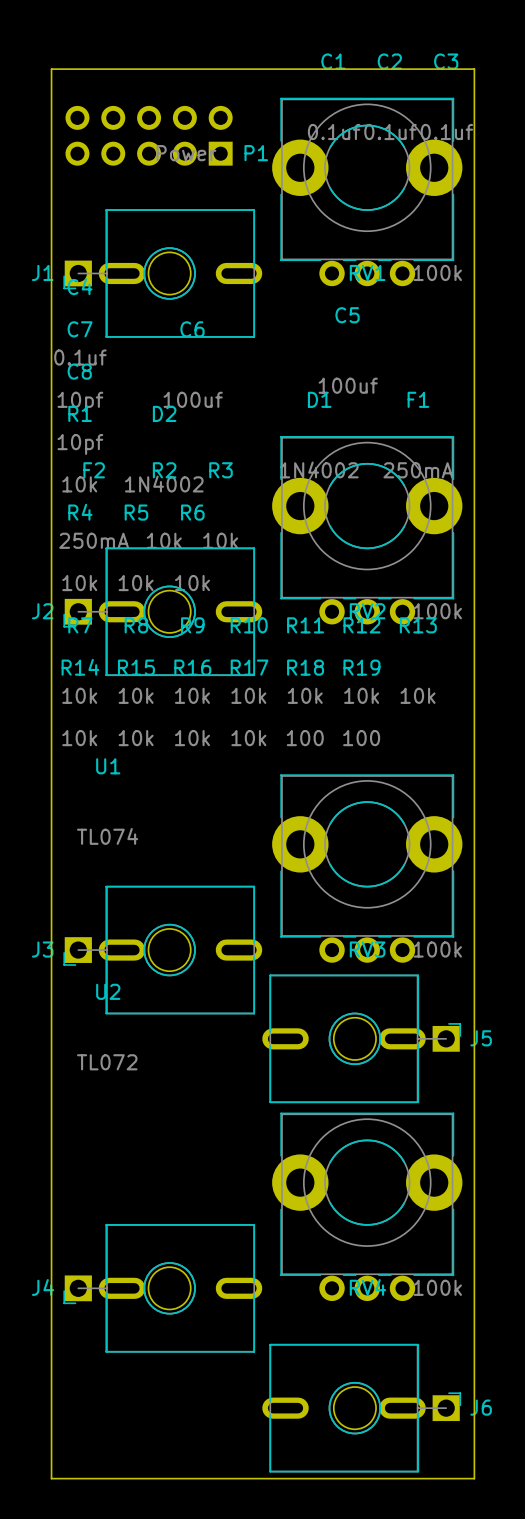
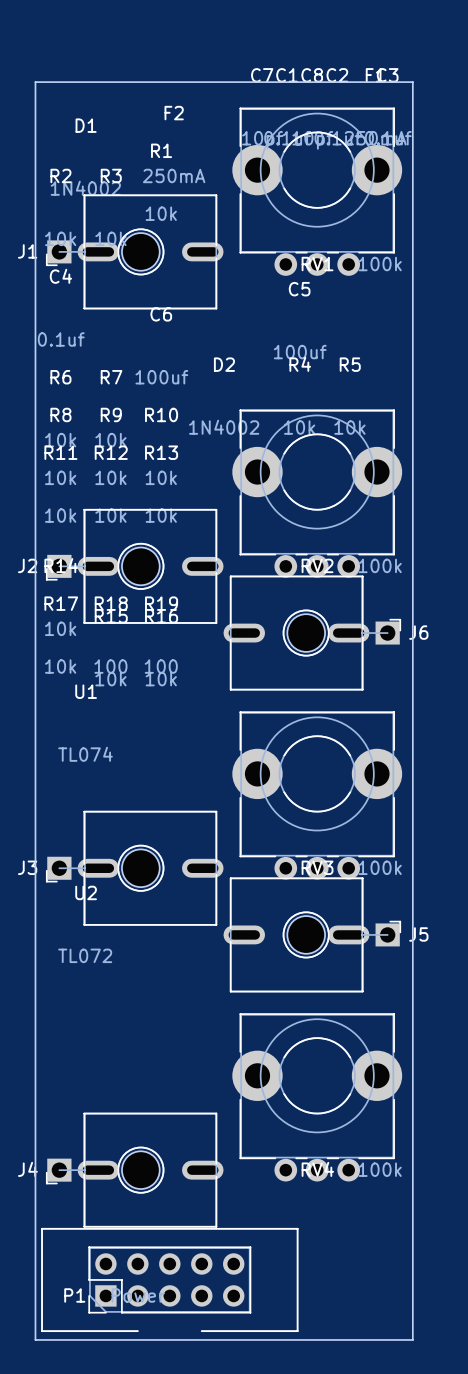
P1 side: bottom (149, 135) -> top (169, 1279)
J1 position: (162, 273) -> (134, 251)
C5 position: (348, 350) -> (300, 320)
C7 position: (80, 366) -> (262, 108)
C8 position: (80, 409) -> (312, 108)
D1 position: (319, 435) -> (85, 157)
F1 position: (418, 435) -> (375, 106)
R1 position: (79, 449) -> (161, 182)
D2 position: (164, 449) -> (224, 396)
F2 position: (94, 505) -> (174, 144)
R2 position: (164, 505) -> (60, 207)
R3 position: (220, 505) -> (110, 207)
R4 position: (79, 547) -> (299, 395)
R5 position: (136, 547) -> (349, 396)
R6 position: (192, 547) -> (60, 408)
R7 position: (79, 660) -> (110, 408)
R8 position: (136, 660) -> (60, 446)
R9 position: (192, 660) -> (110, 446)
R10 position: (249, 660) -> (161, 446)
R11 position: (305, 660) -> (60, 484)
R12 position: (361, 660) -> (111, 484)
R13 position: (418, 660) -> (161, 484)
R14 position: (80, 702) -> (61, 597)
R17 position: (249, 702) -> (61, 635)
R18 position: (305, 702) -> (111, 635)
R19 position: (361, 702) -> (161, 635)
U1 position: (107, 801) -> (85, 723)
U2 position: (107, 1027) -> (85, 924)
J5 position: (361, 1038) -> (312, 934)
J6 position: (361, 1408) -> (312, 633)

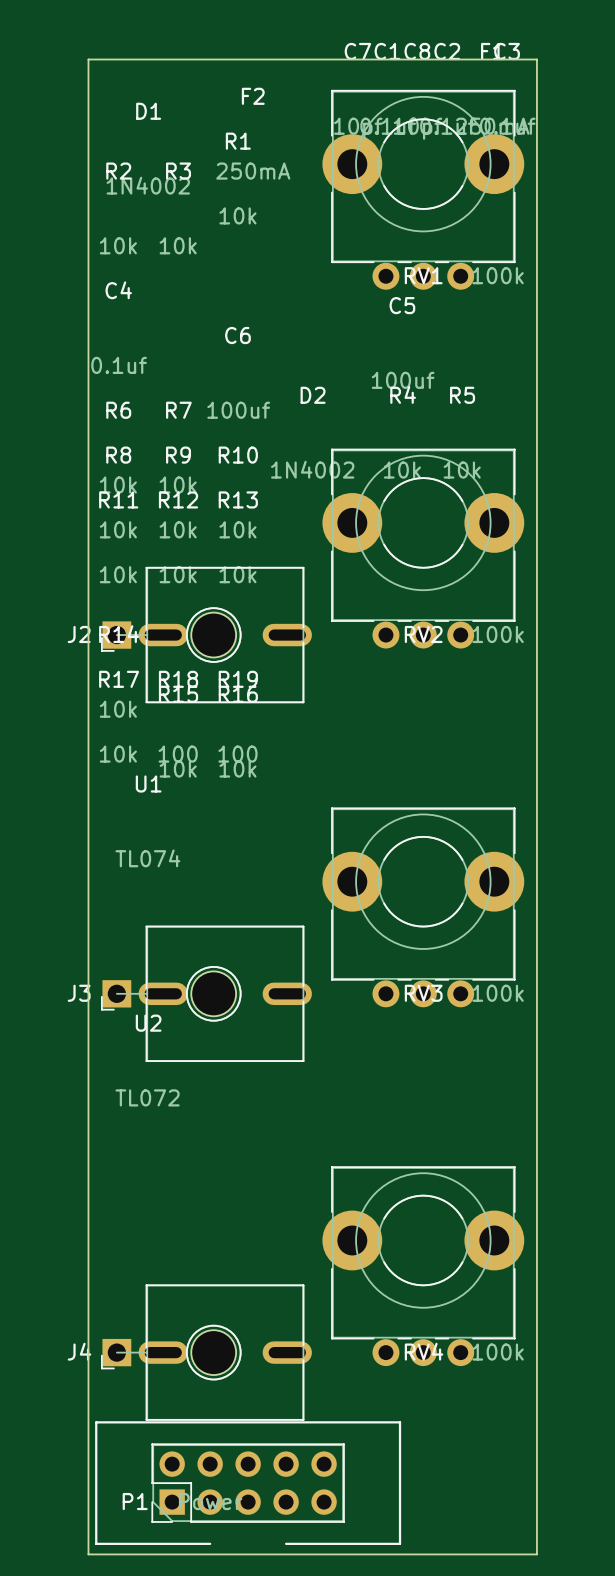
J1: (134, 251) -> none
J6: (312, 633) -> none
J5: (312, 934) -> none

